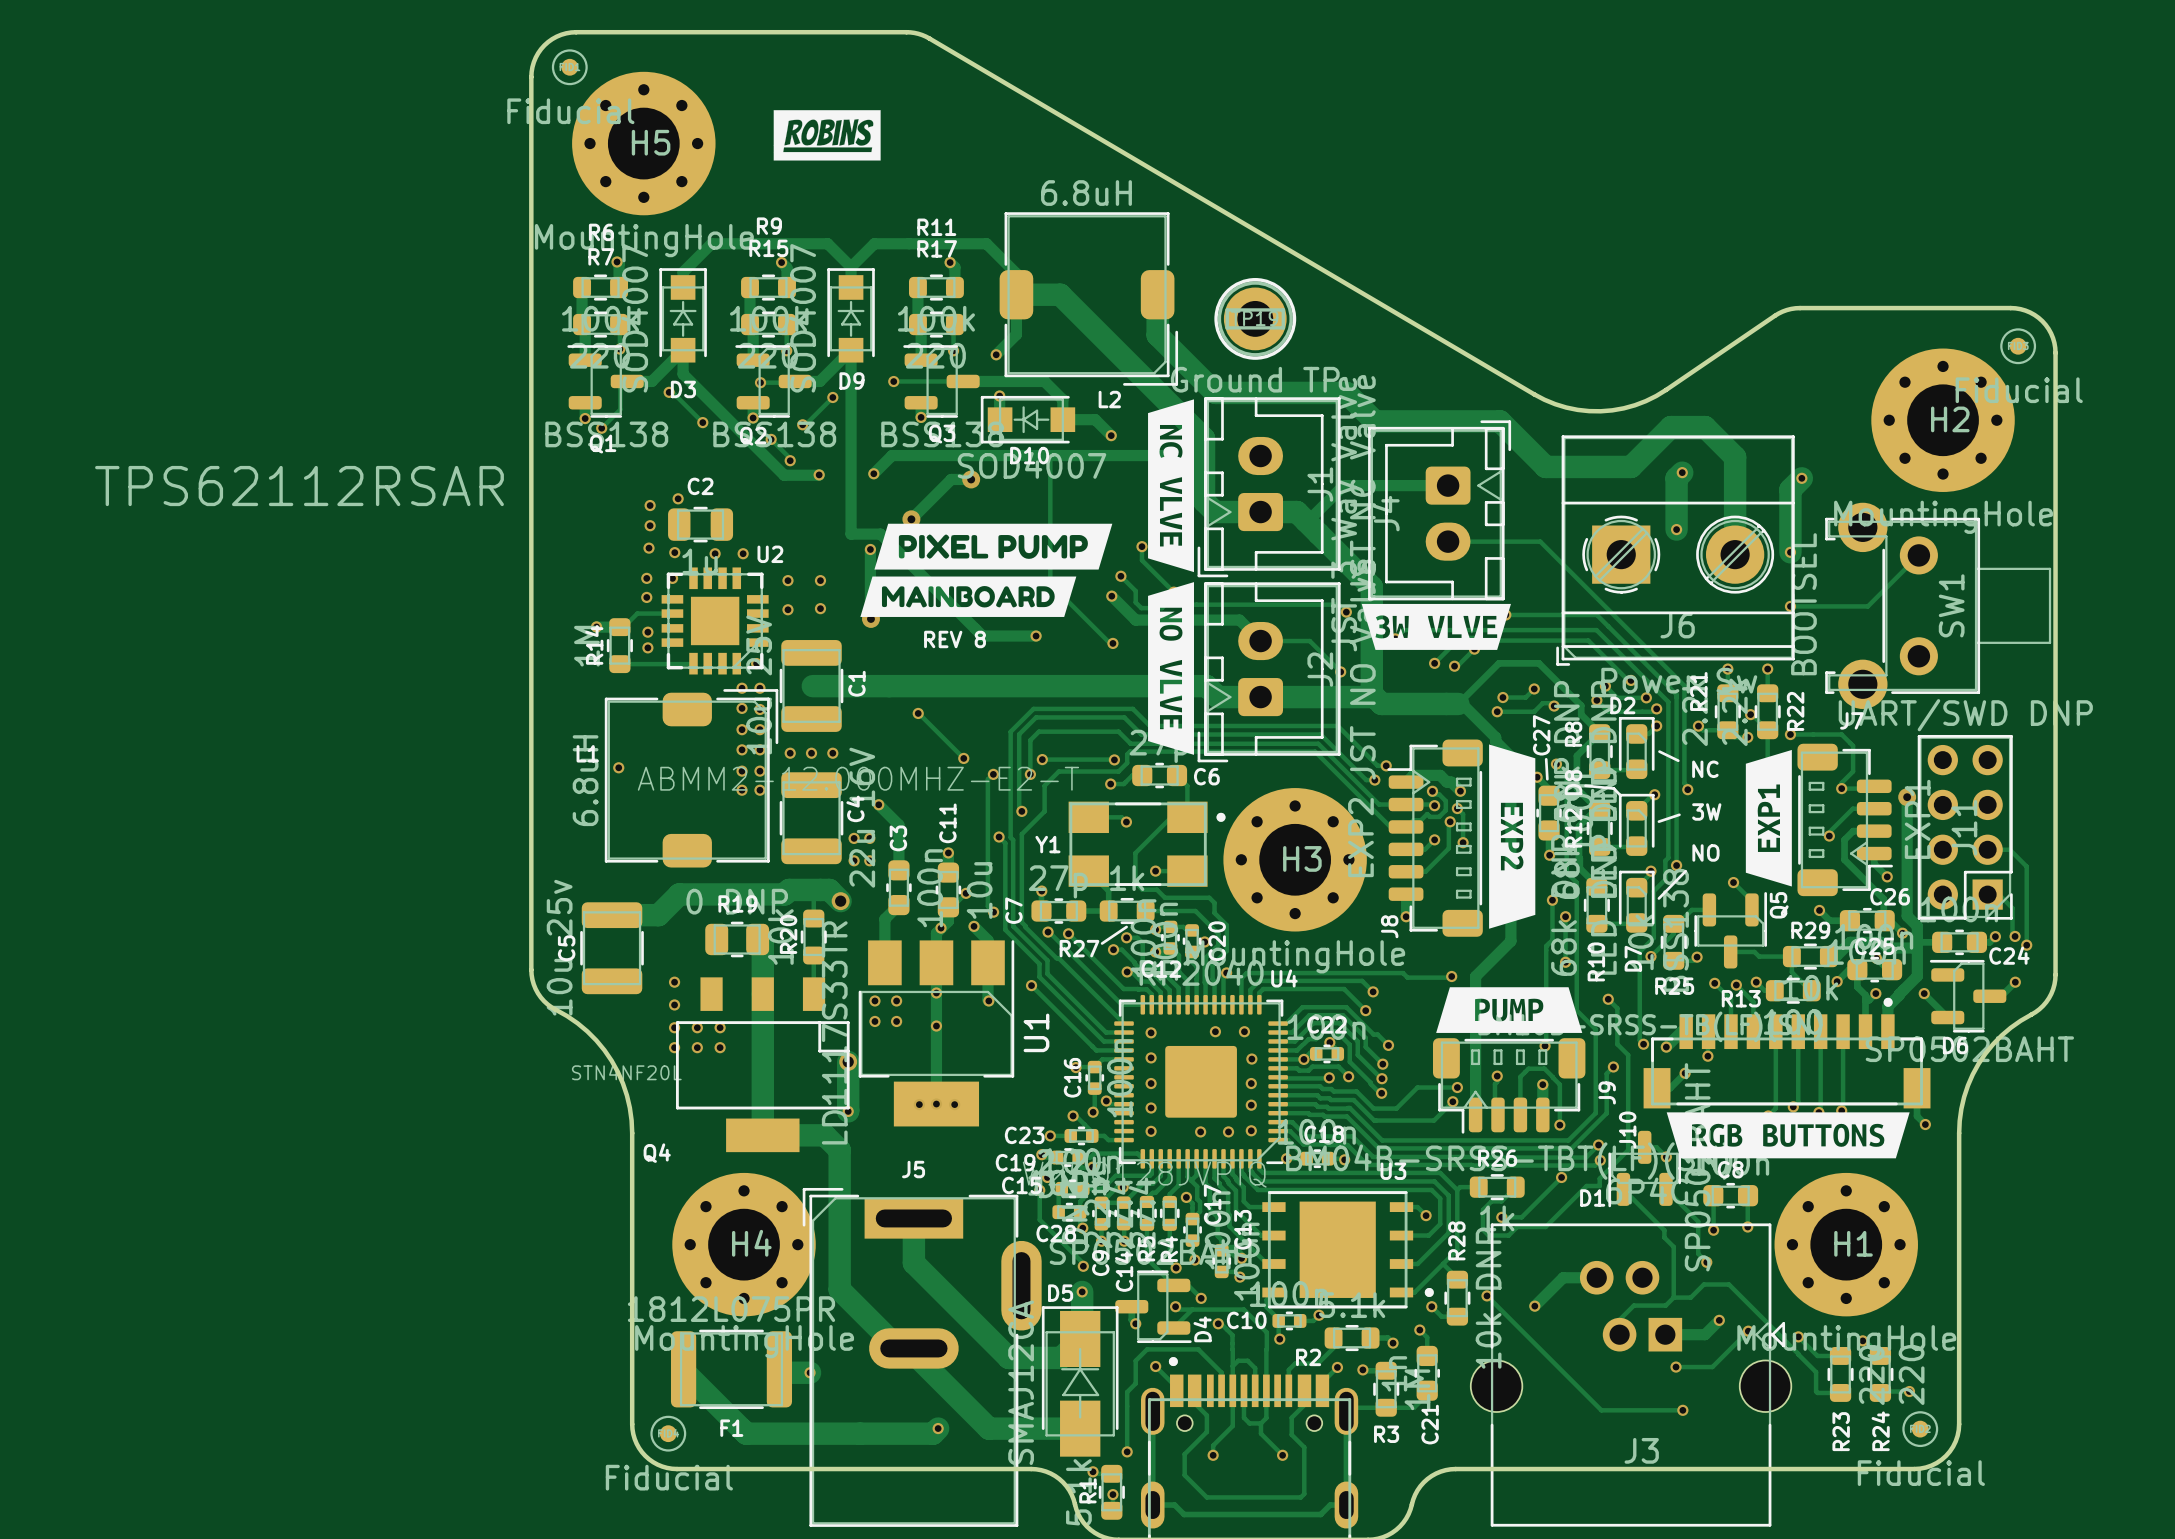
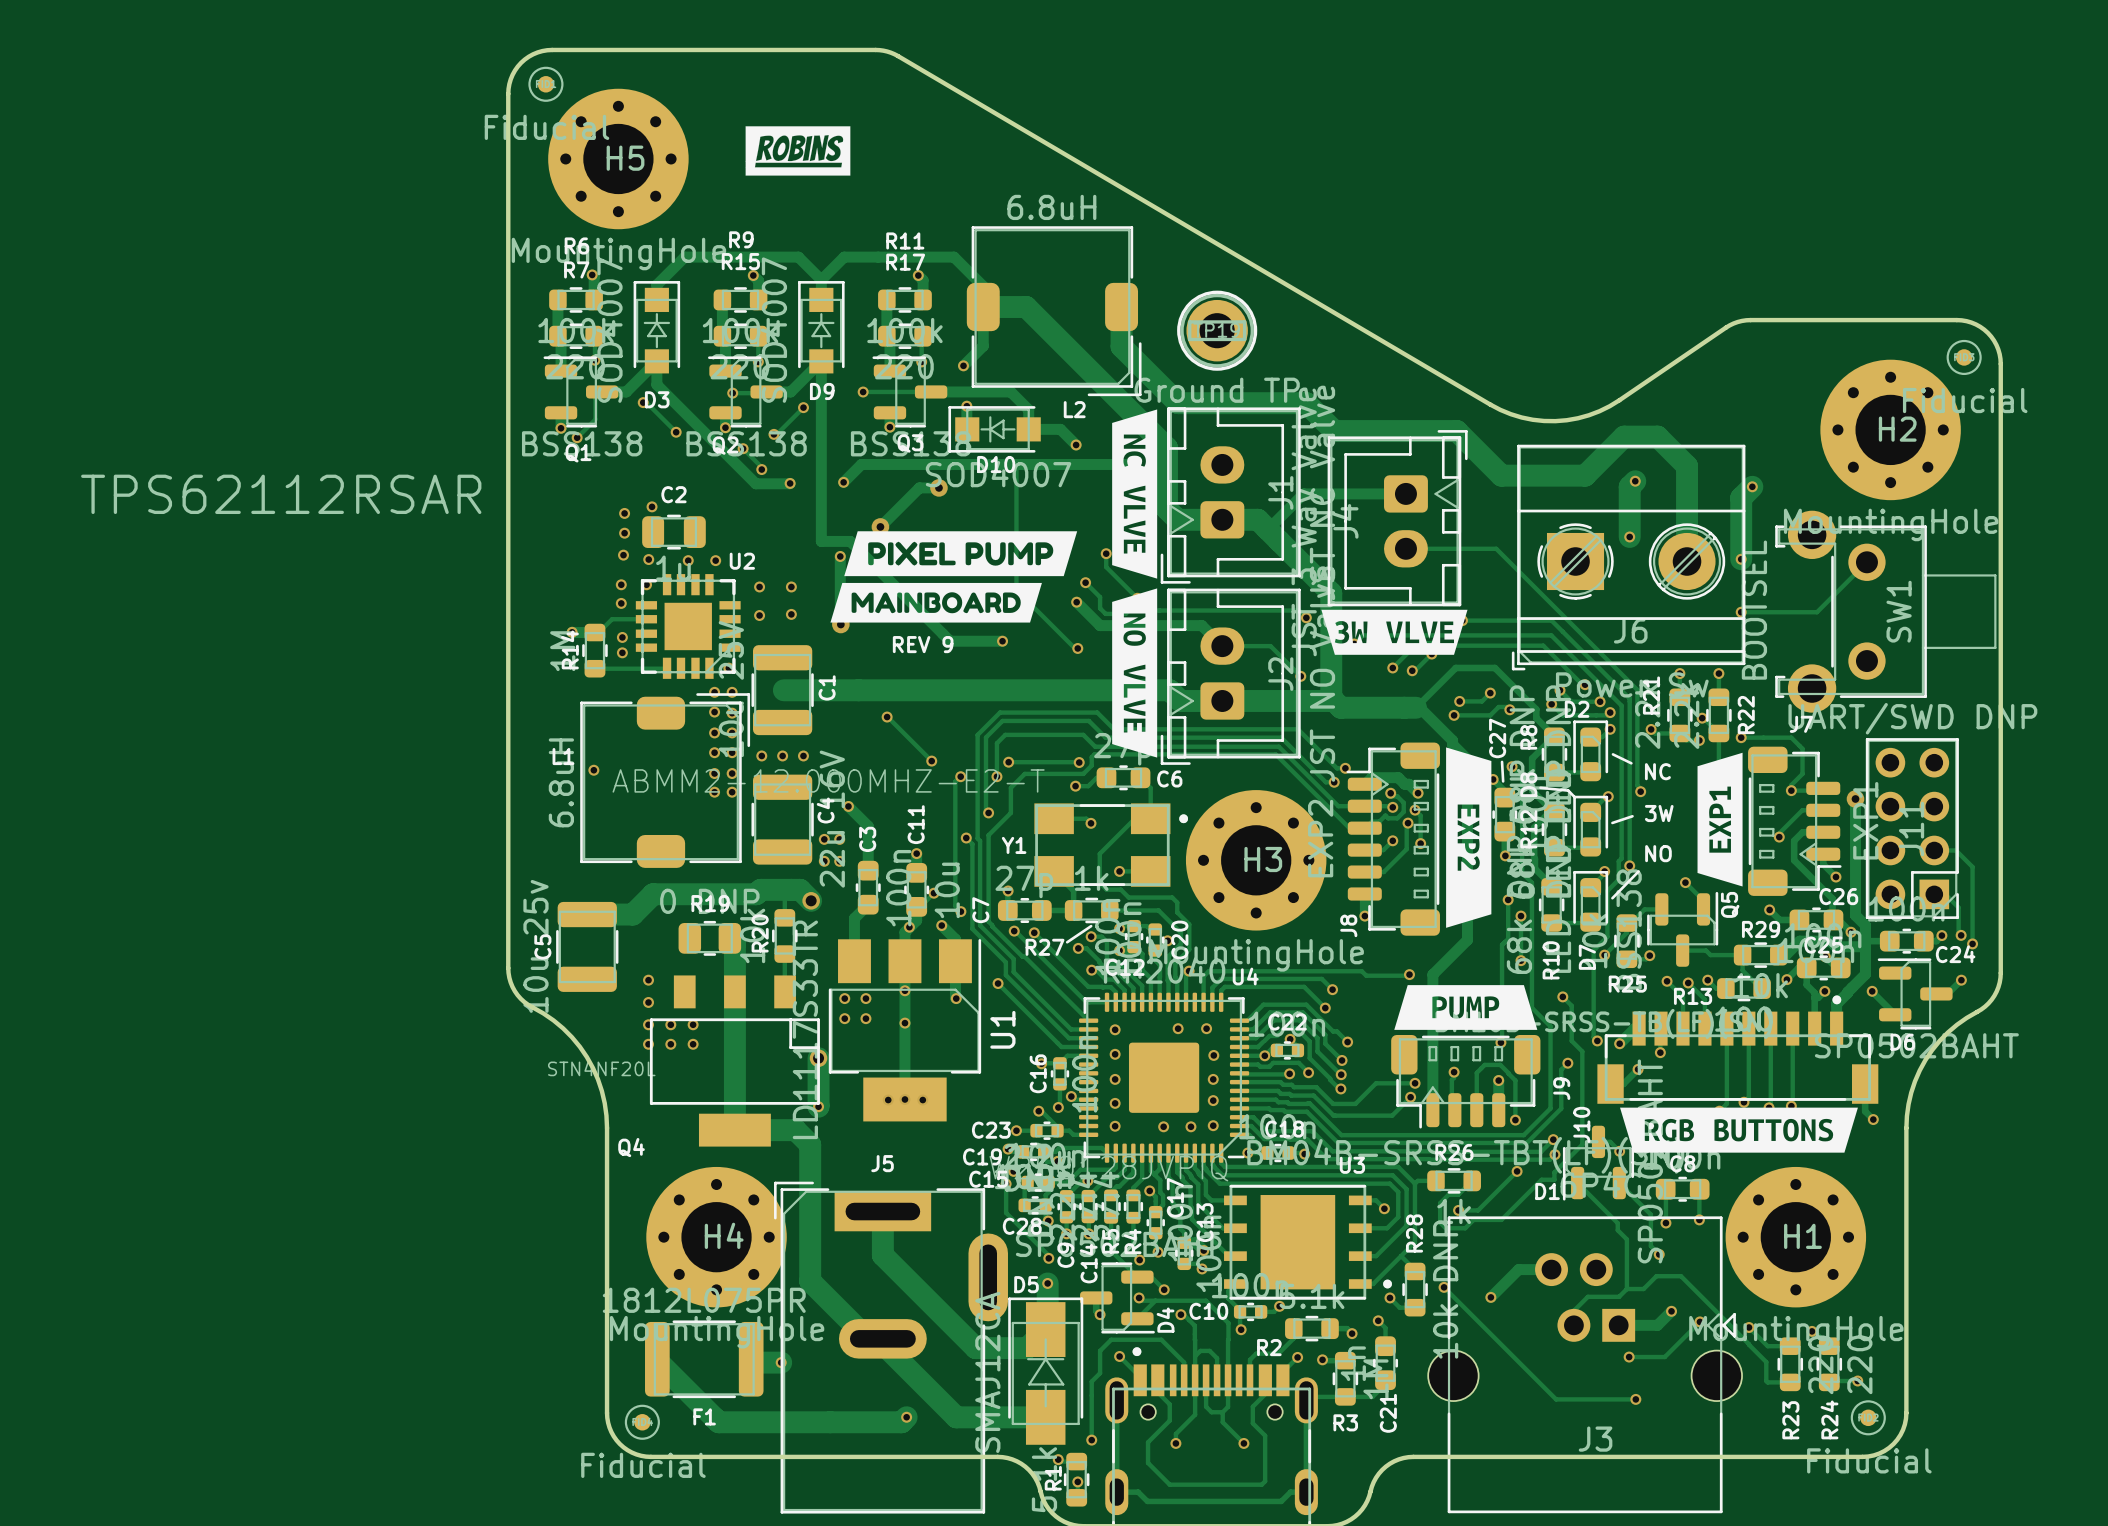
text: REV 8 (955, 639) -> REV 9 (923, 644)

